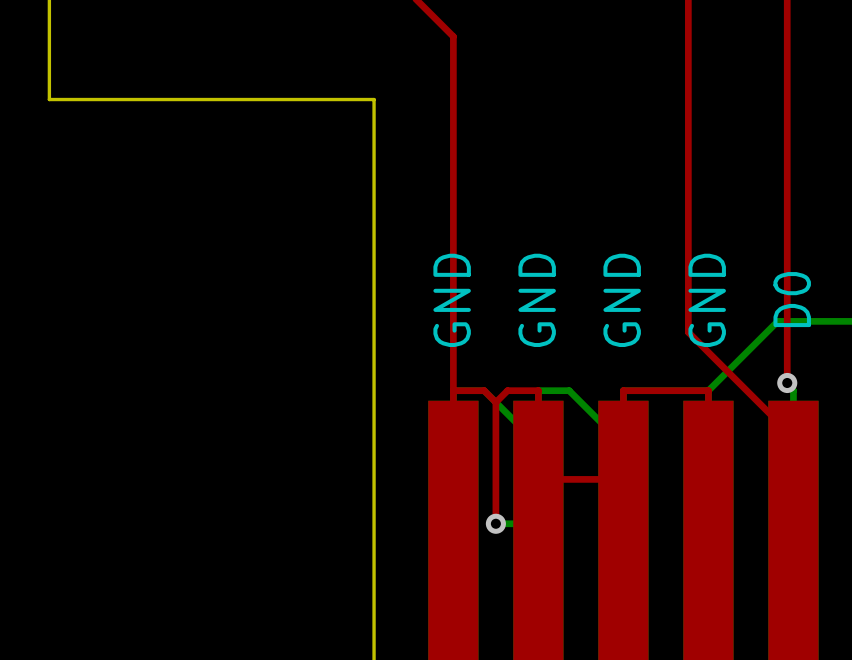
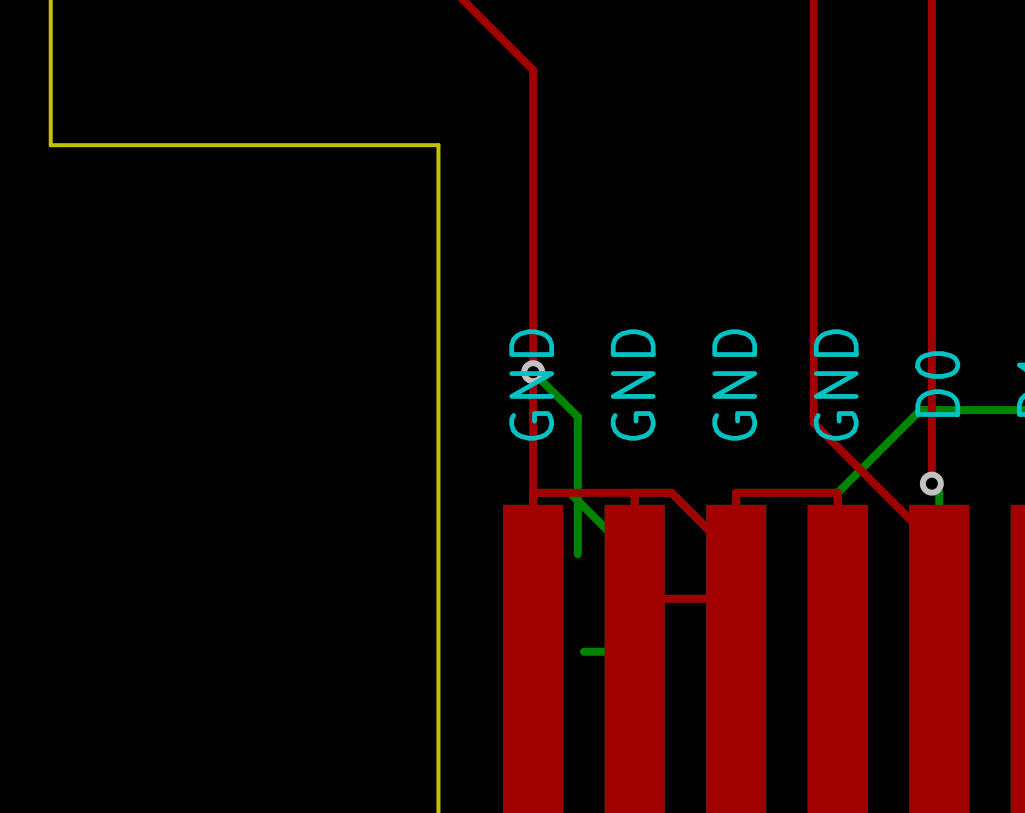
bottom track: none -> (533, 372) (577, 416) (577, 554)
via: none -> (533, 372)
top track: (484, 390) (495, 402) -> none
top track: (507, 390) (495, 402) -> (597, 492) (569, 492)
top track: none -> (634, 492) (671, 492) (736, 557)
top track: (495, 402) (495, 523) -> none
via: (495, 523) -> none

